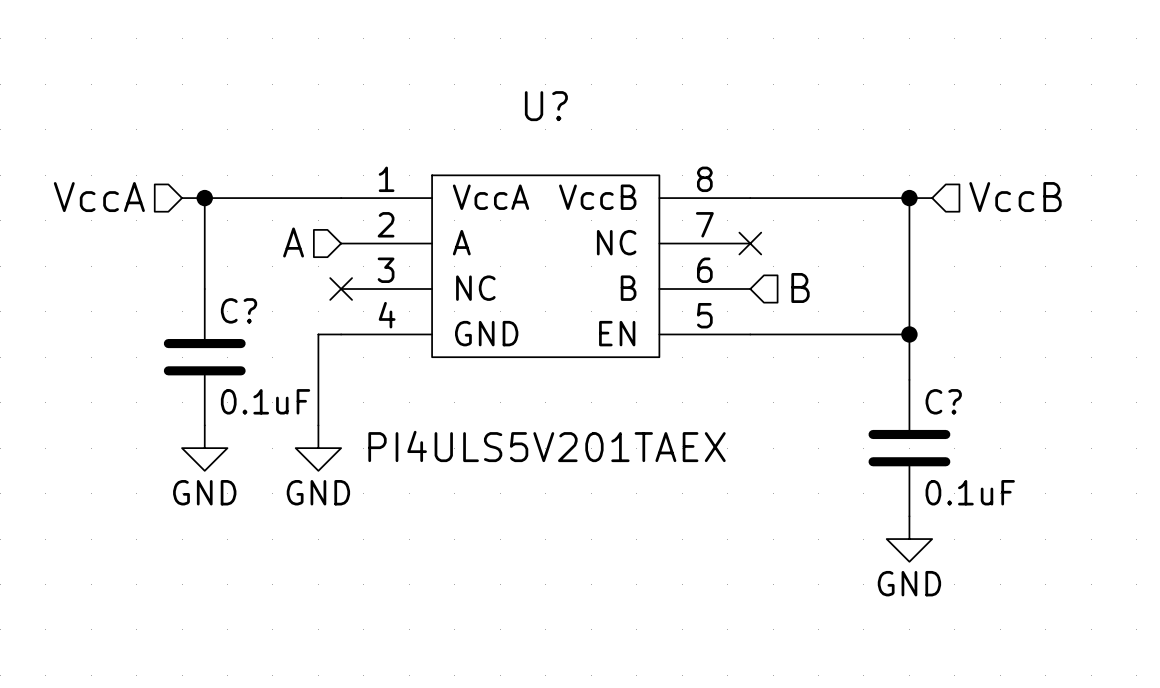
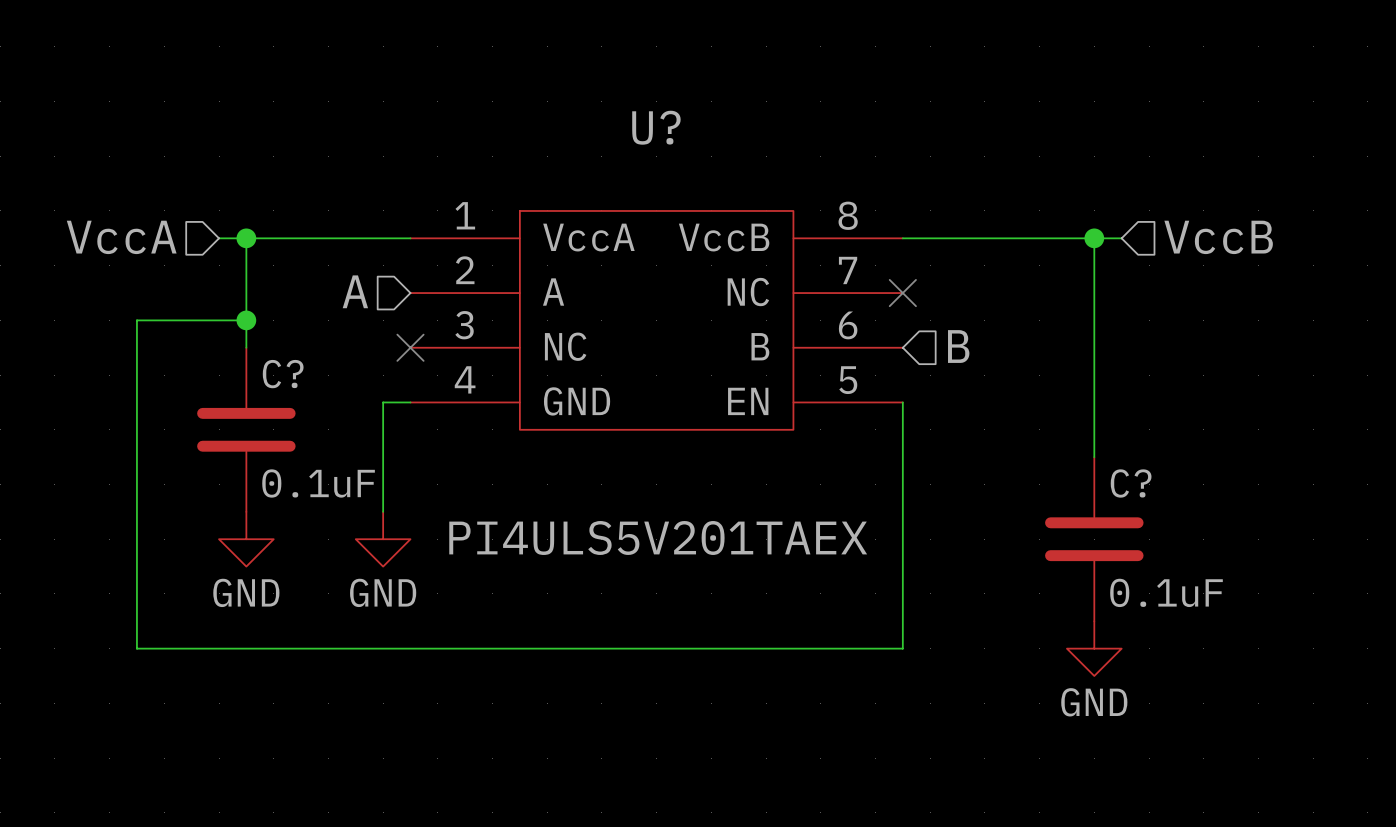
junction: none -> (246, 320)
wire: (750, 334) (909, 334) -> (902, 402) (902, 648) (136, 648) (136, 320) (246, 320)
junction: (909, 334) -> none

